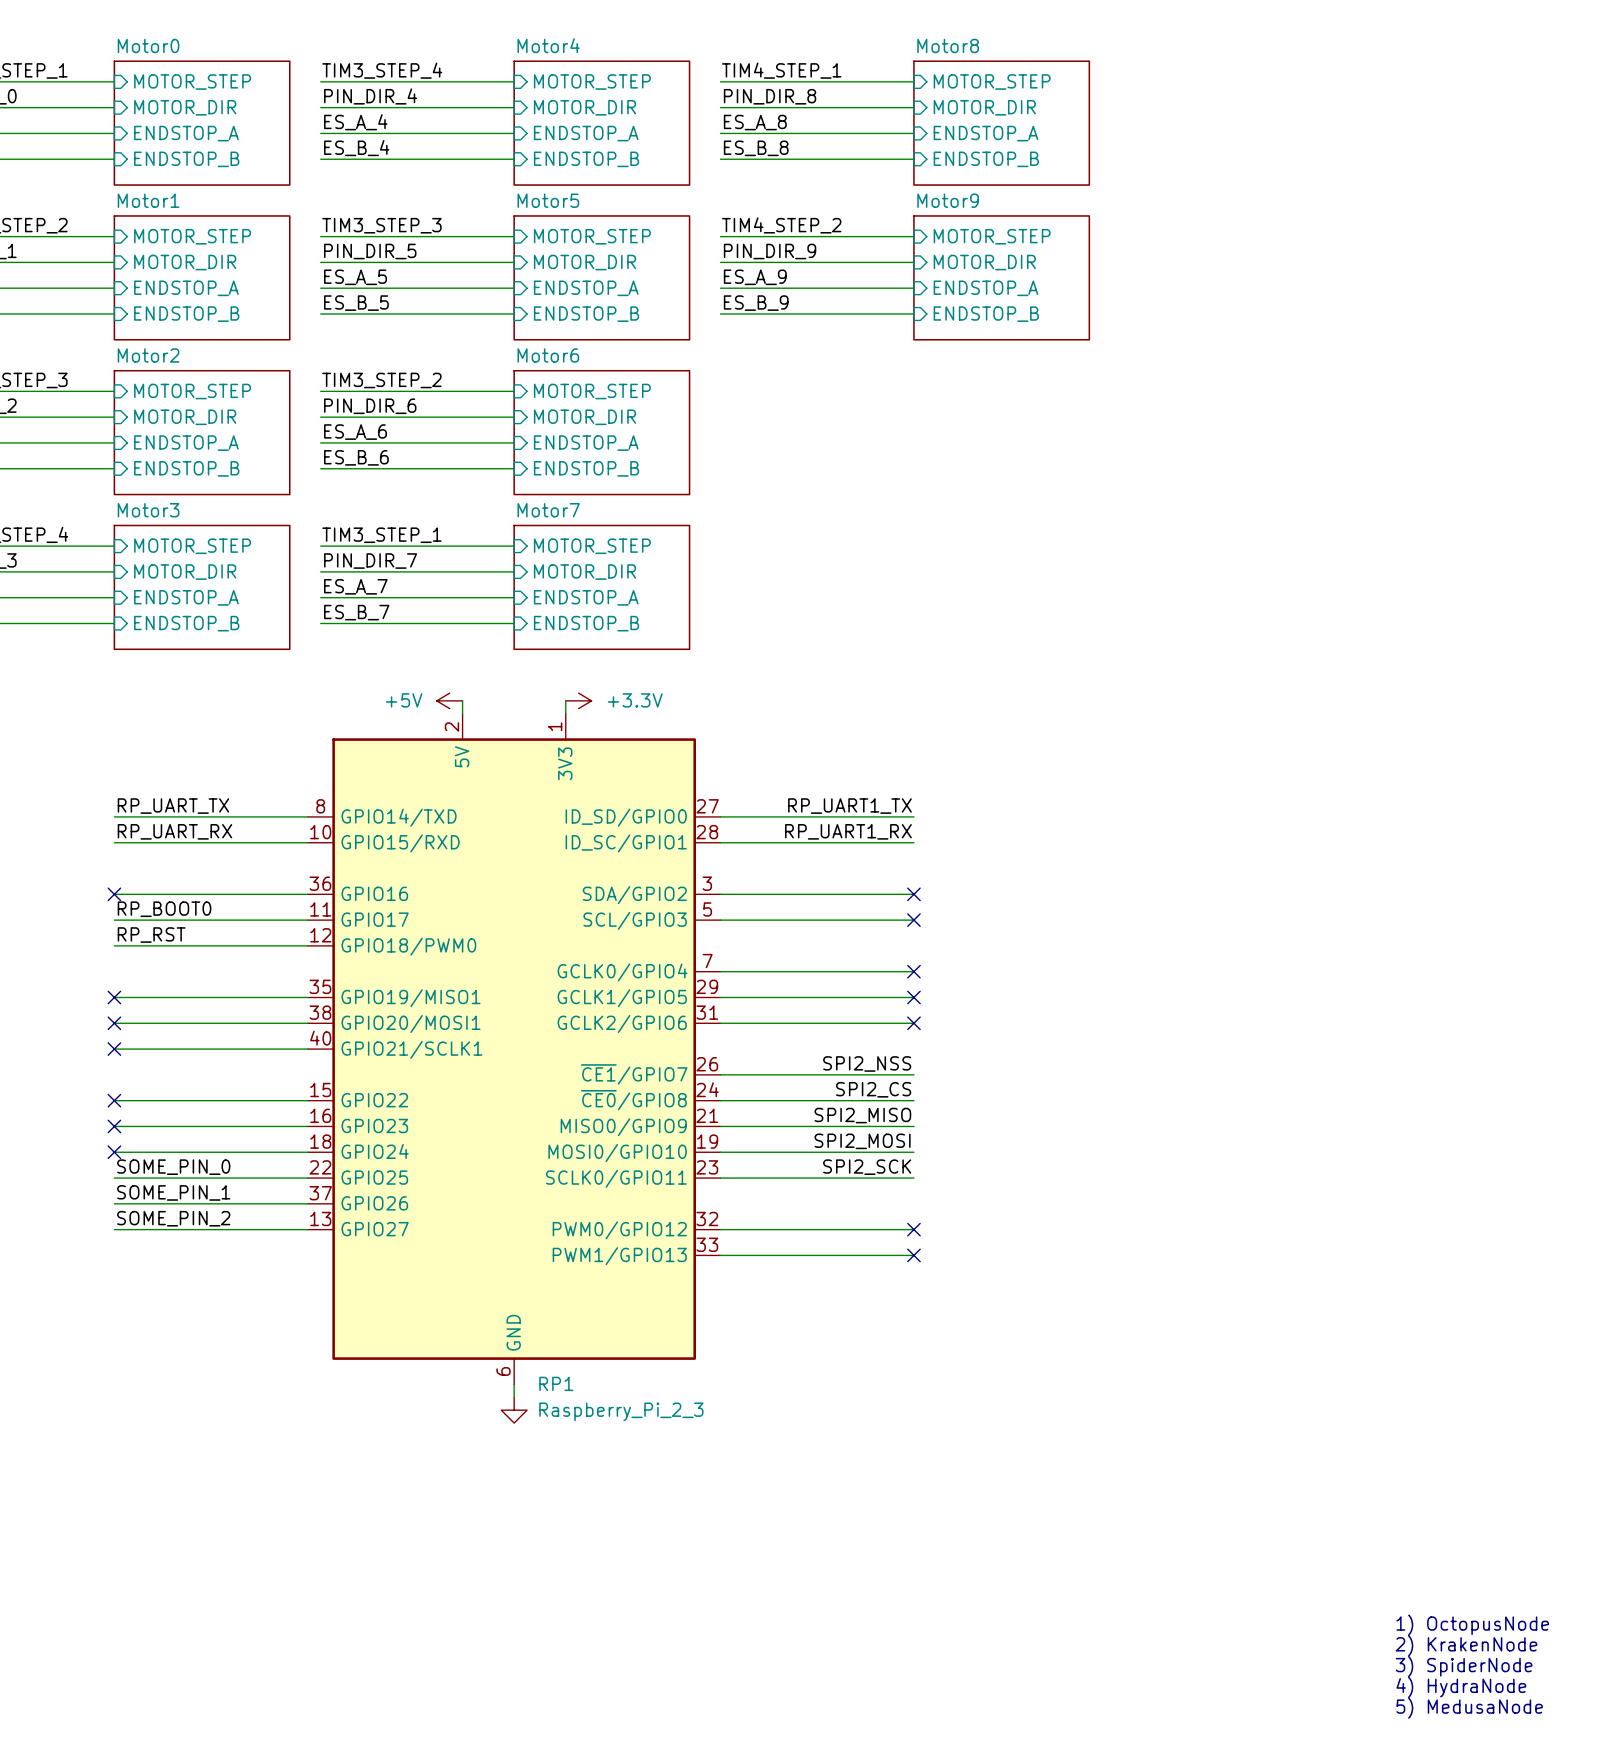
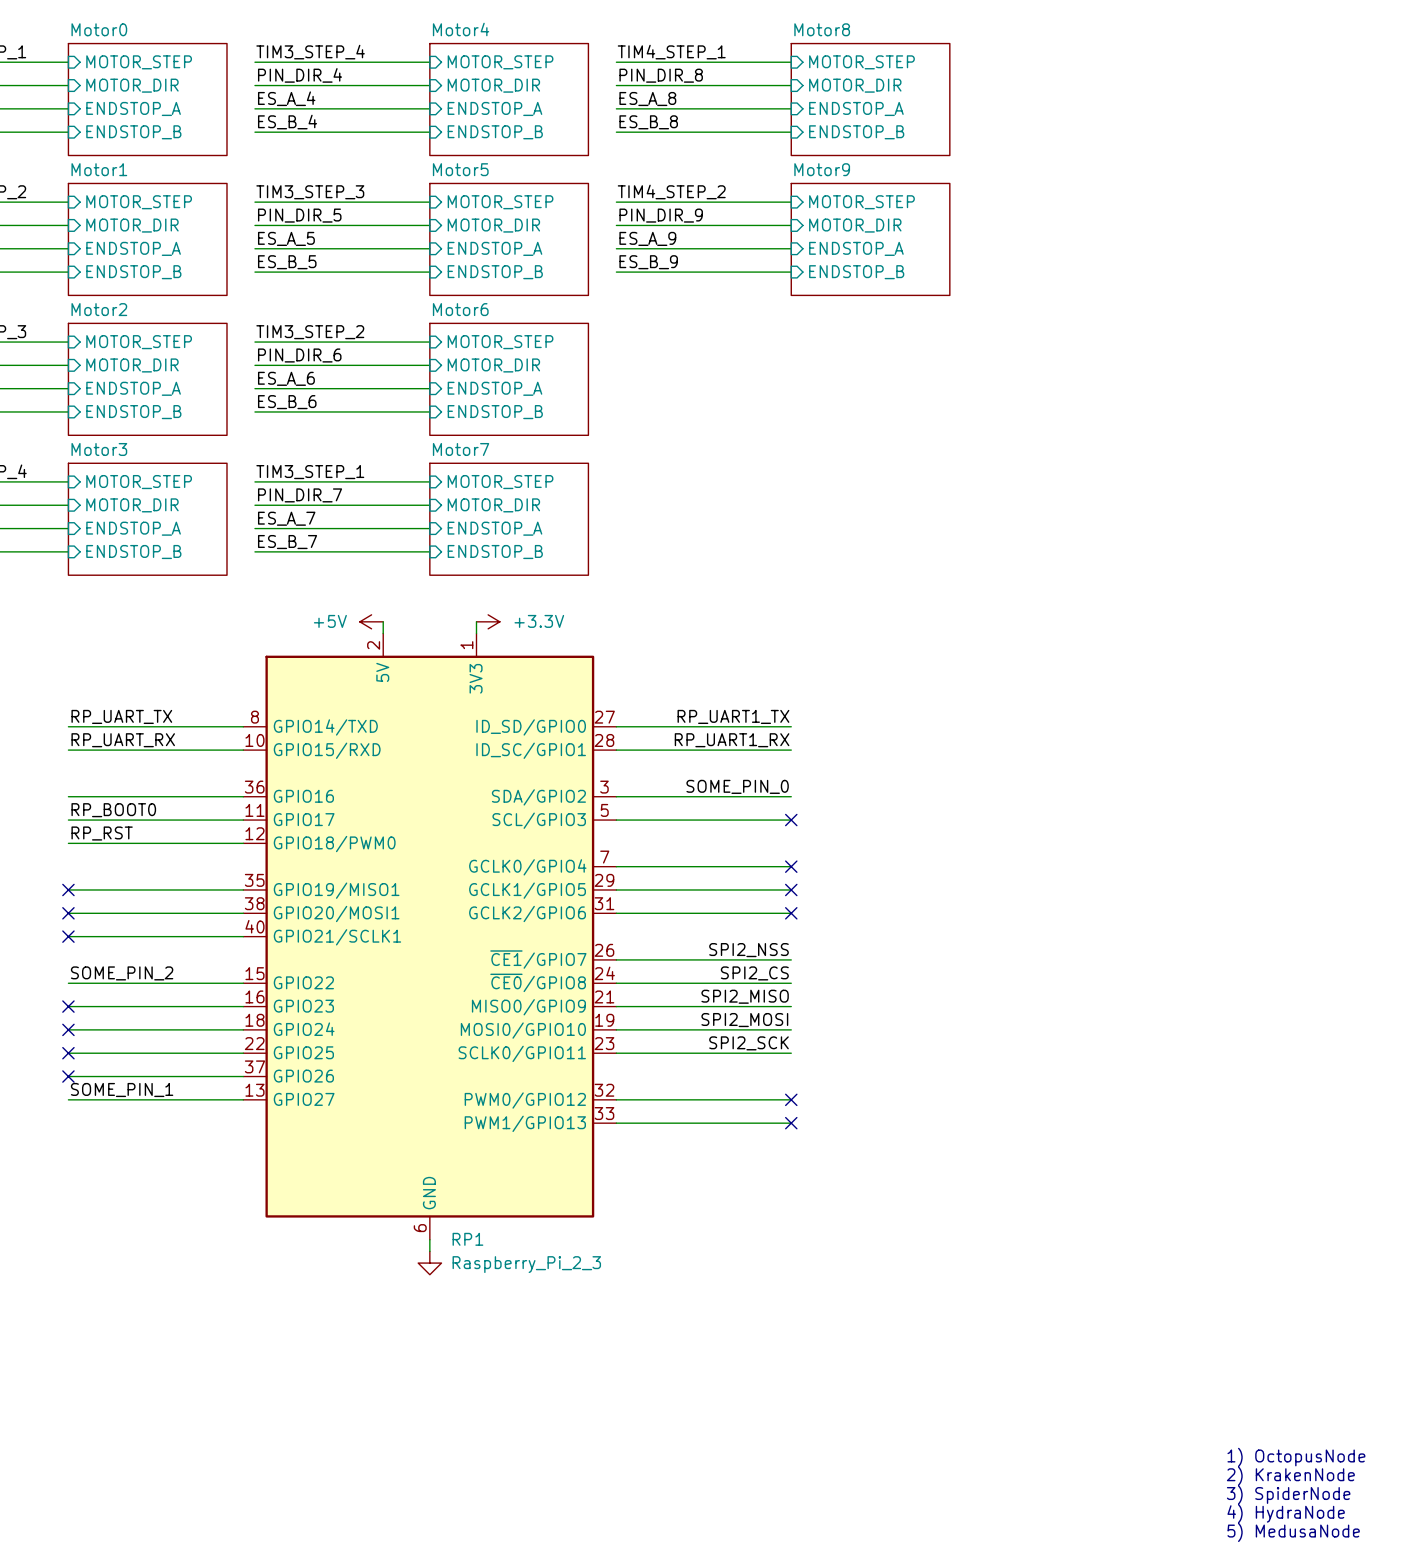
label: none -> SOME_PIN_0 (737, 786)
no-connect mark: (114, 894) -> none
no-connect mark: (913, 894) -> none
label: none -> SOME_PIN_2 (122, 973)
no-connect mark: (114, 1100) -> none
label: SOME_PIN_0 (173, 1167) -> none
no-connect mark: none -> (68, 1053)
label: SOME_PIN_1 (173, 1192) -> none
no-connect mark: none -> (68, 1076)
label: SOME_PIN_2 (173, 1218) -> SOME_PIN_1 (122, 1090)

